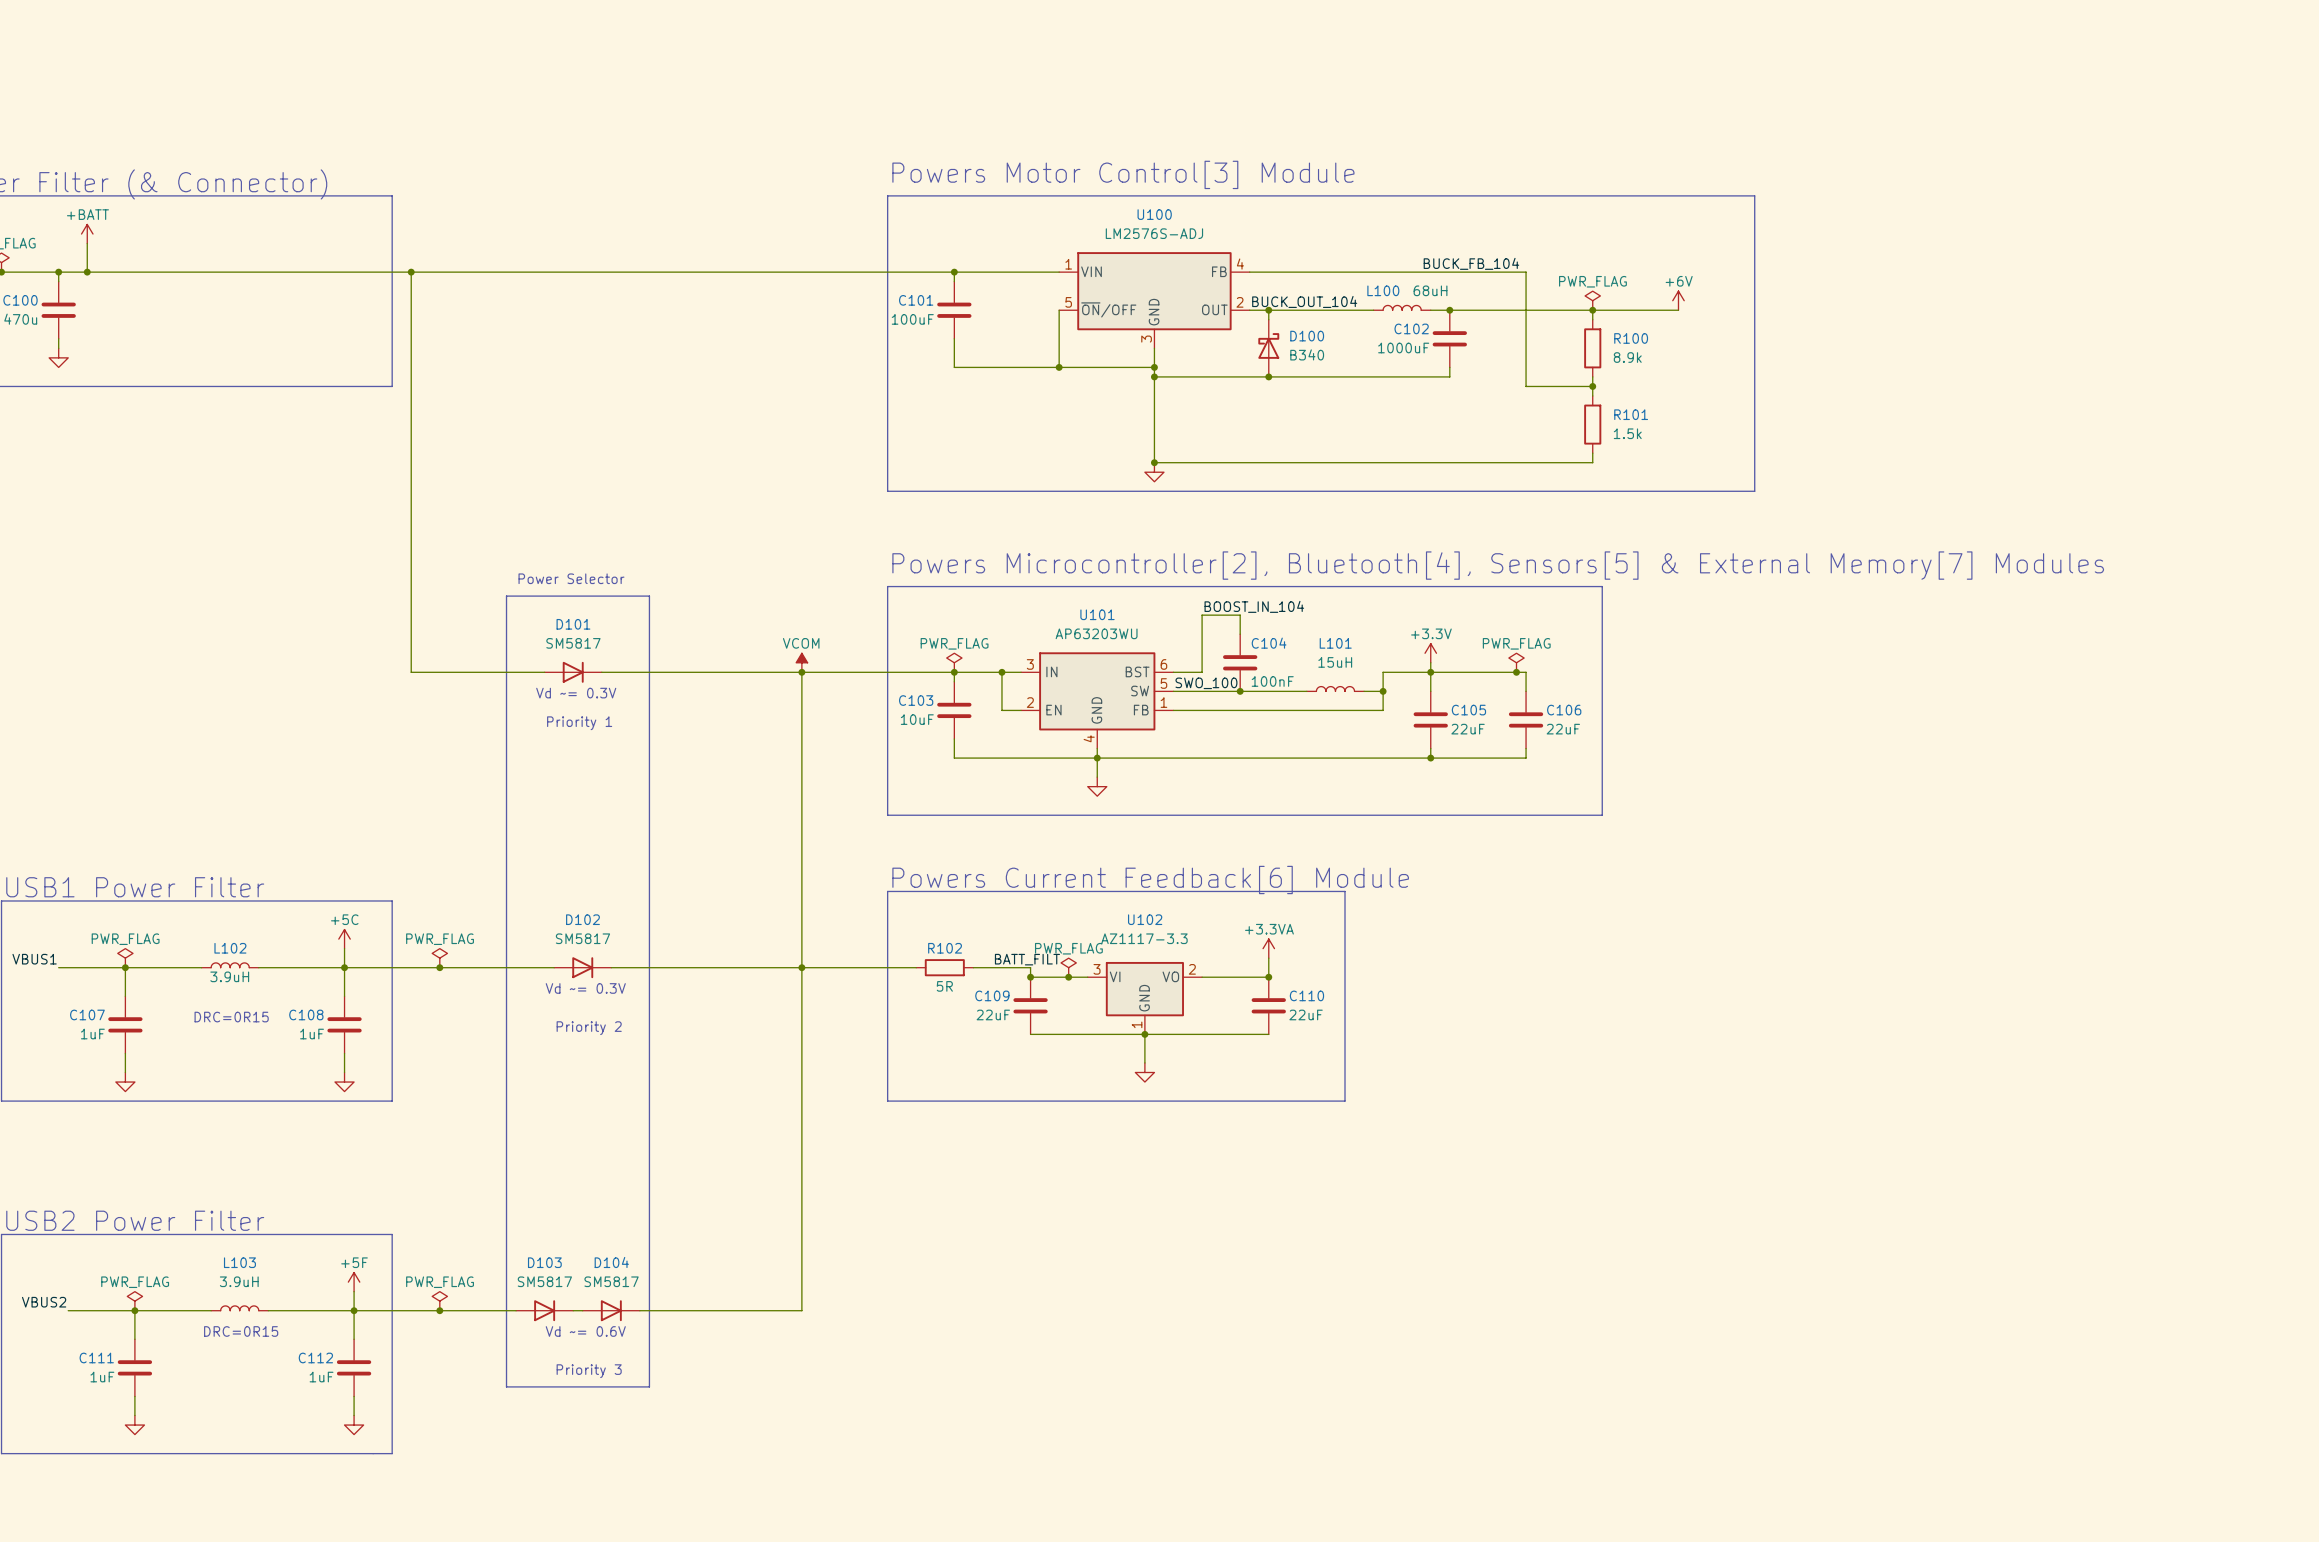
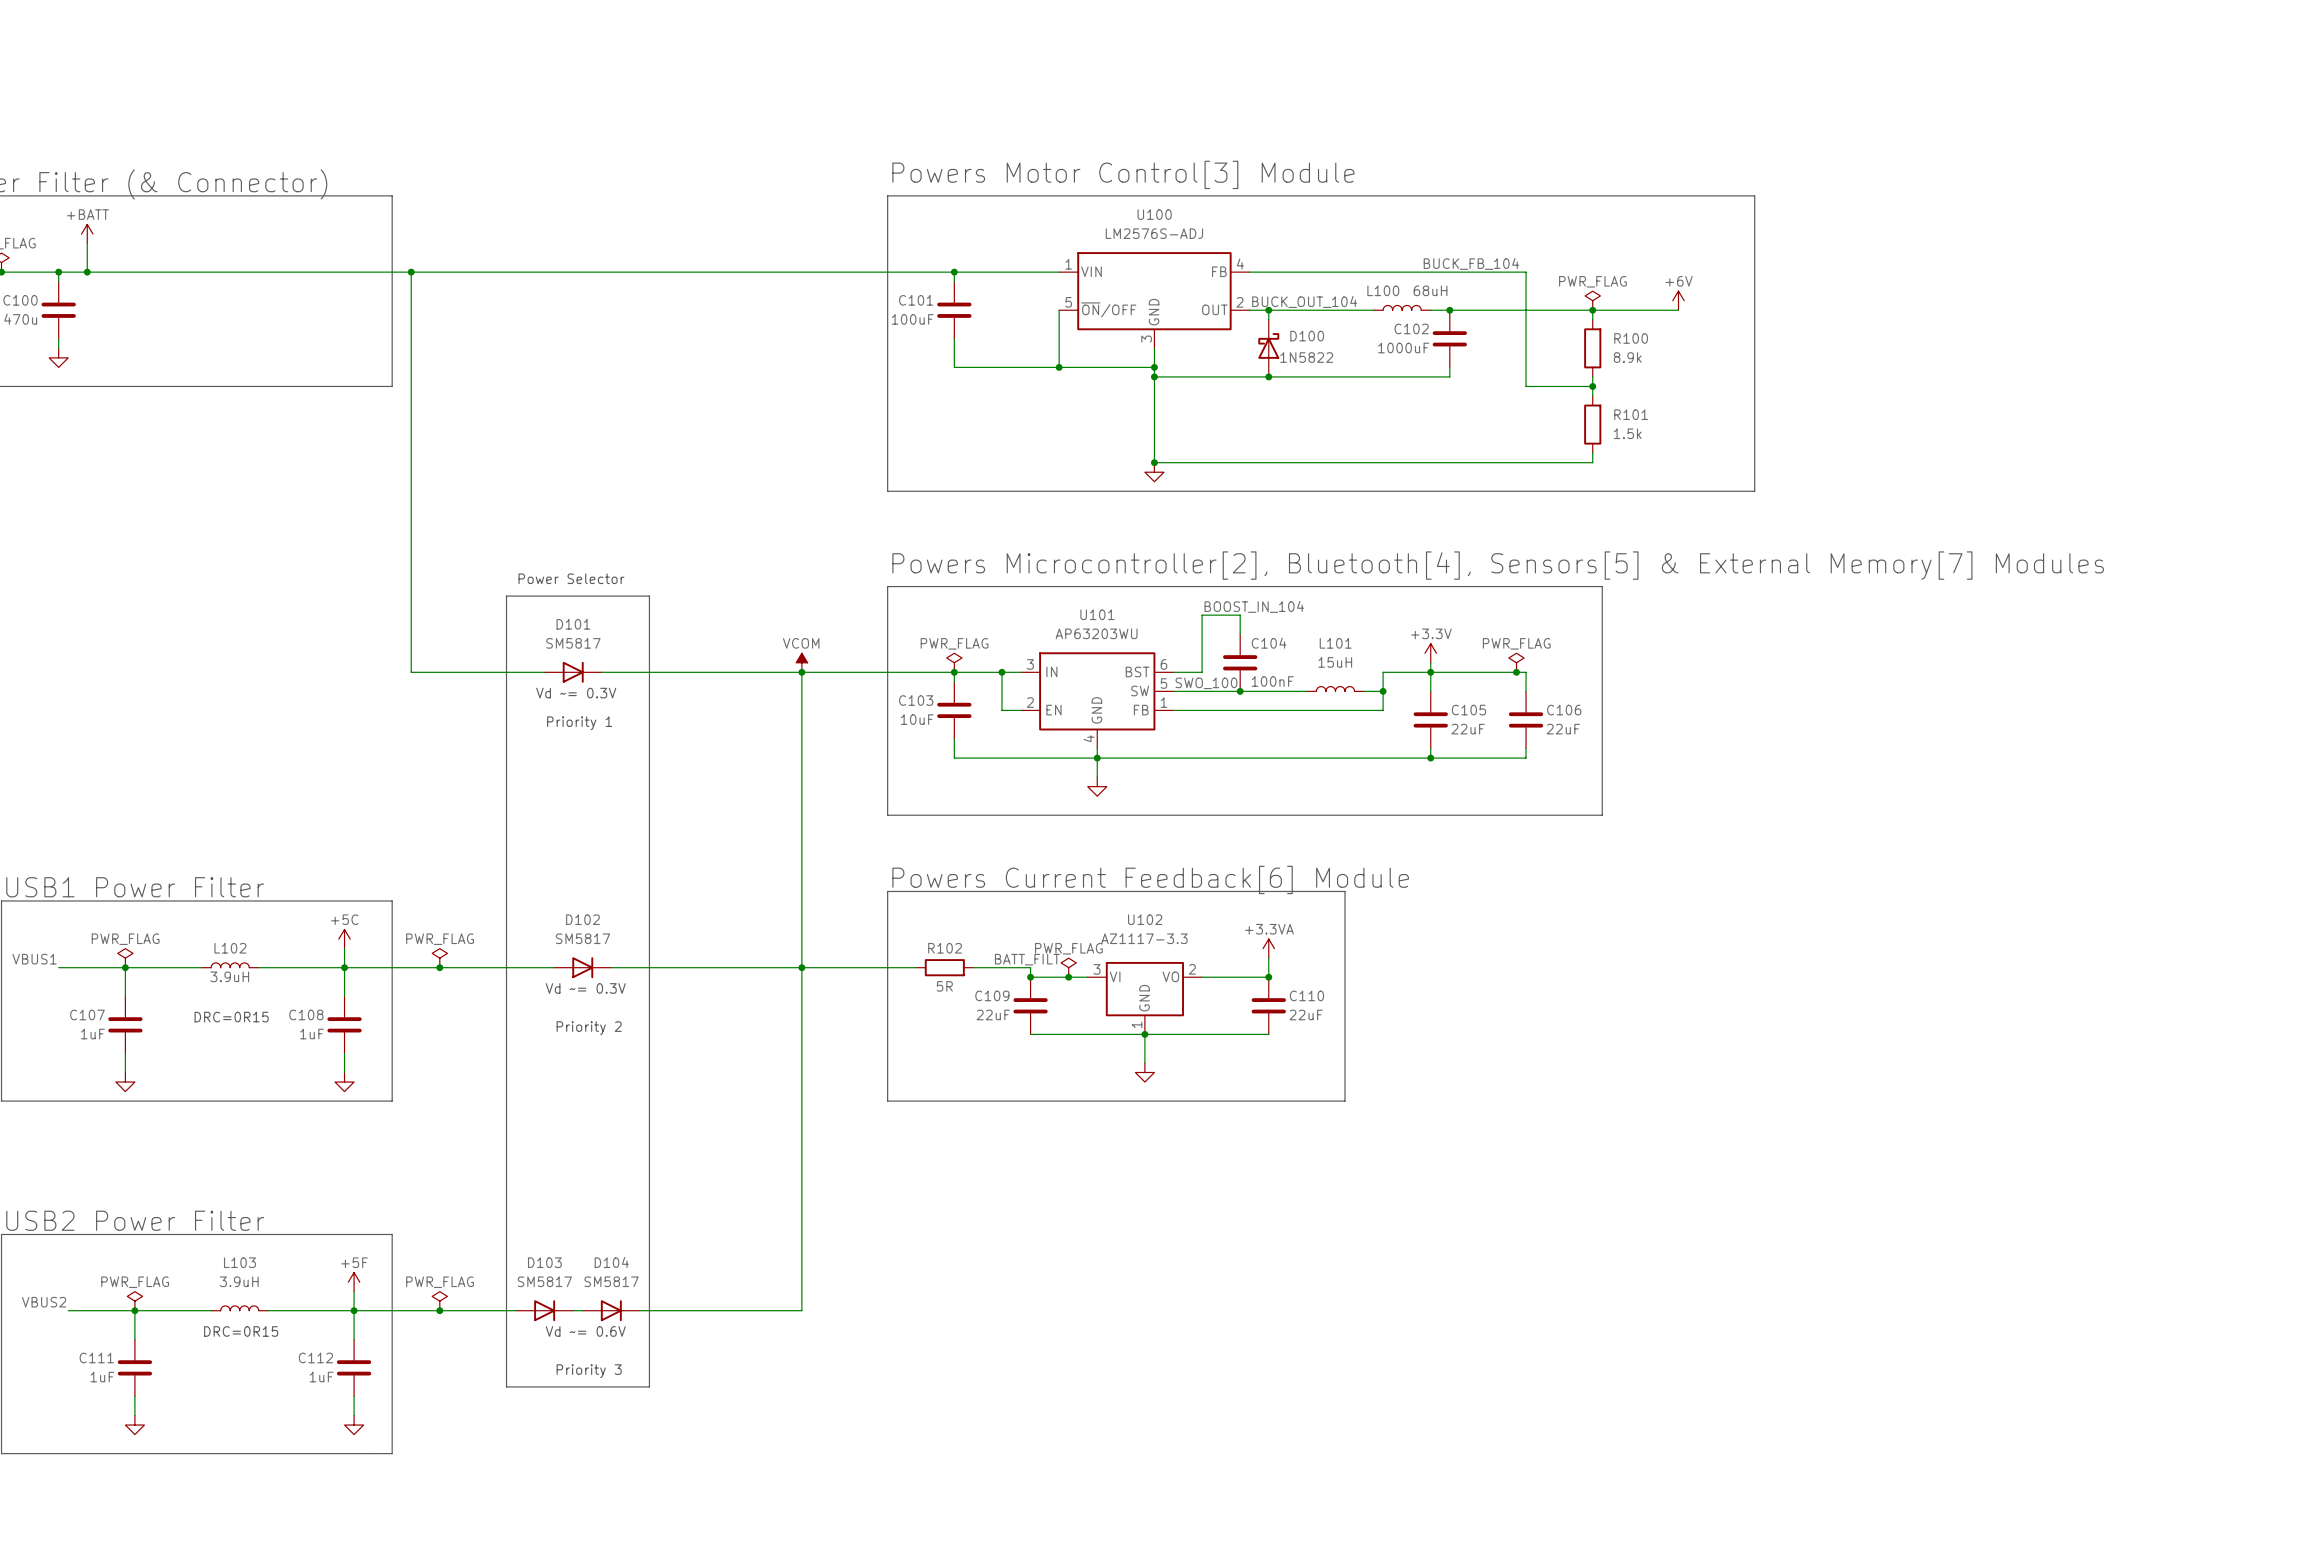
D100 value: B340 (1307, 354) -> 1N5822 (1306, 357)

